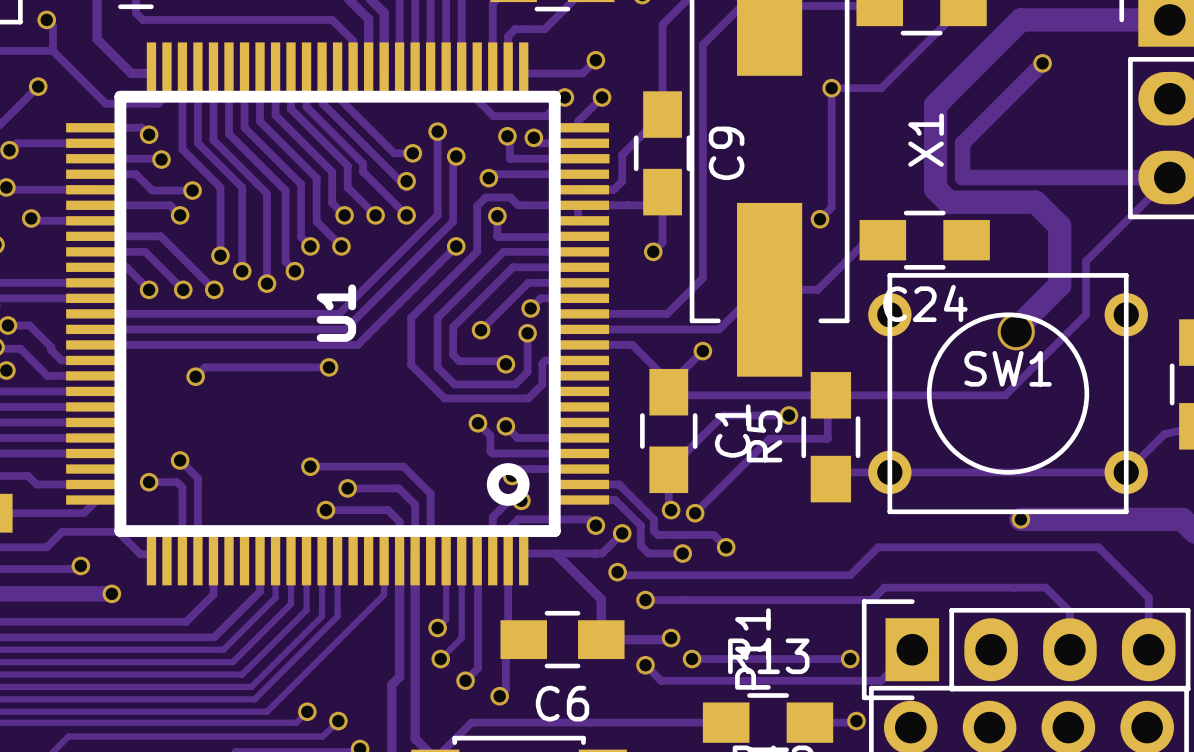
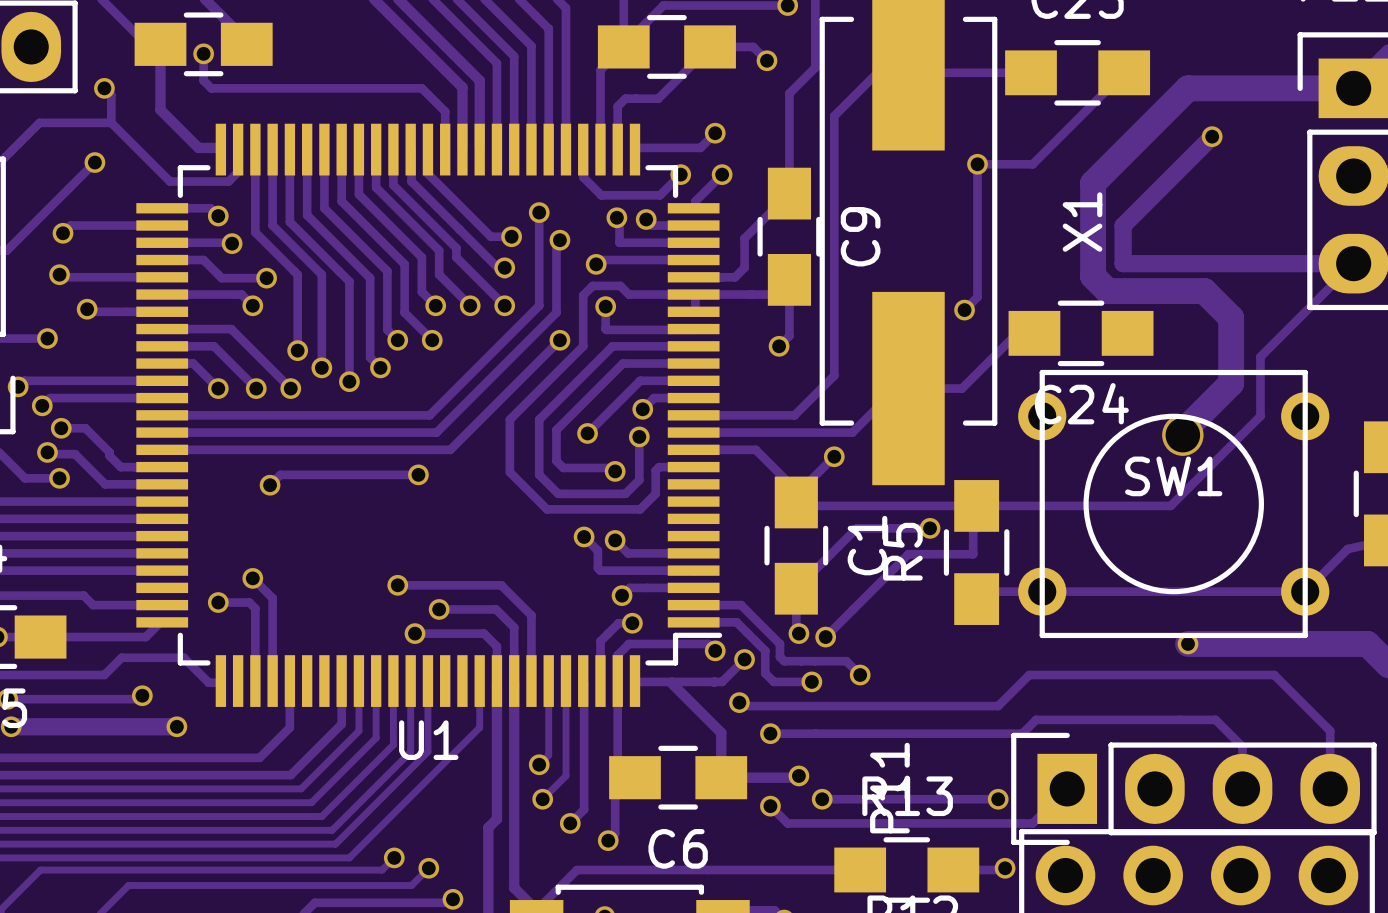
U1 footprint: [66, 42, 610, 586] -> [136, 123, 723, 707]
U1 name position: U1 (336, 313) -> U1 (428, 740)

